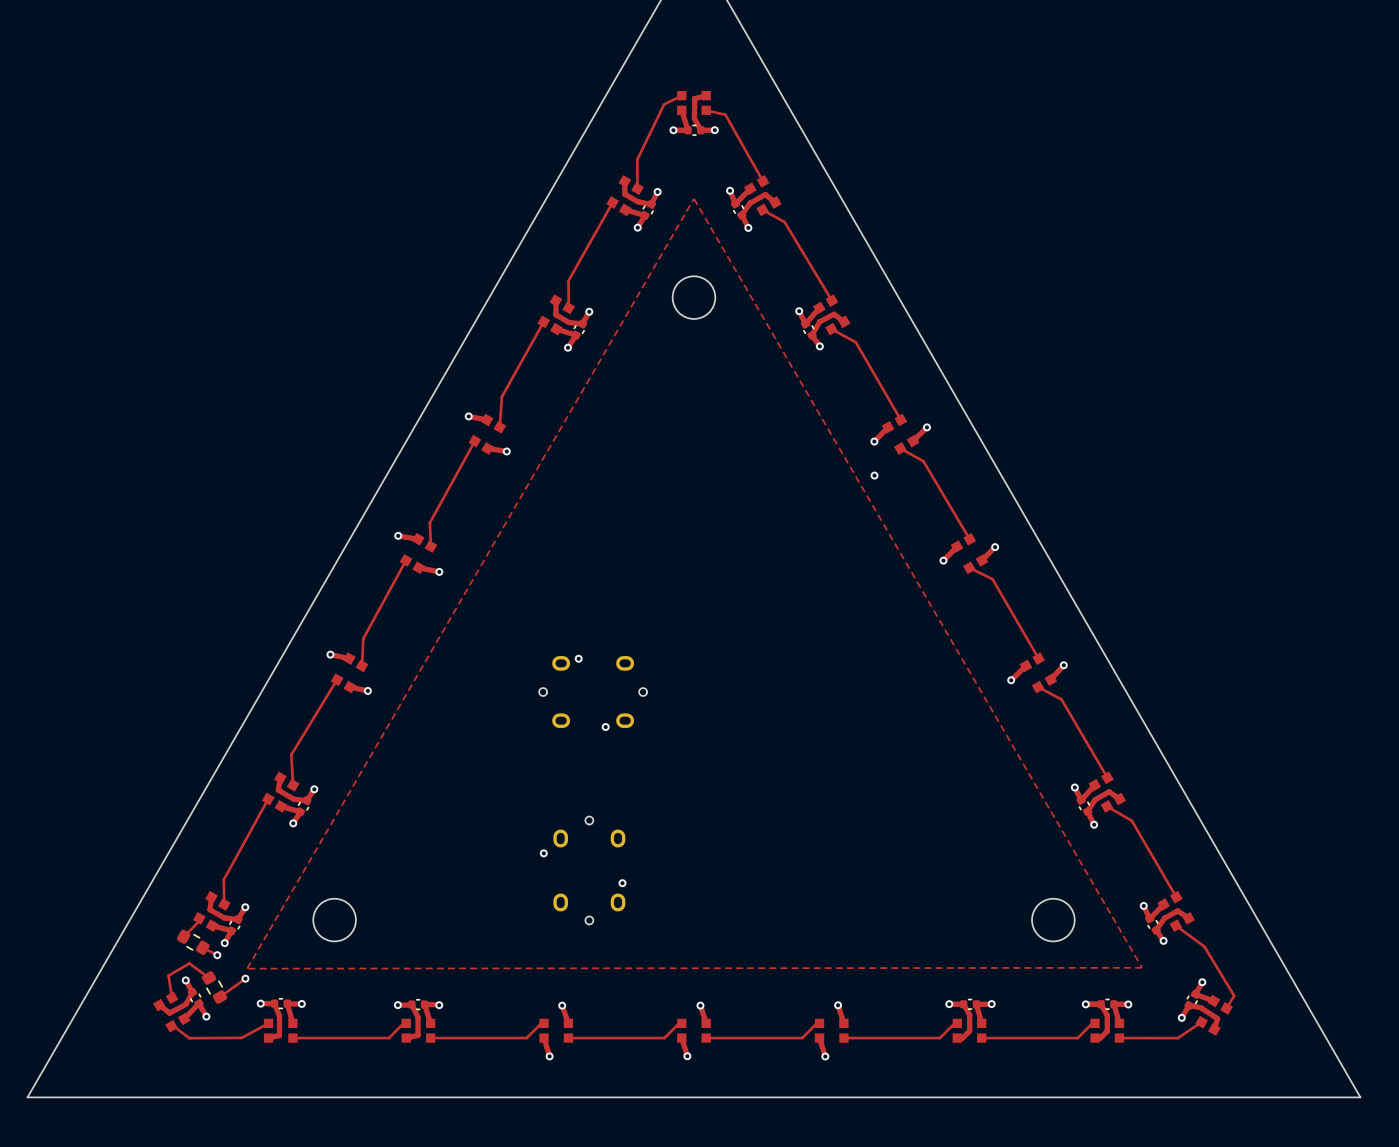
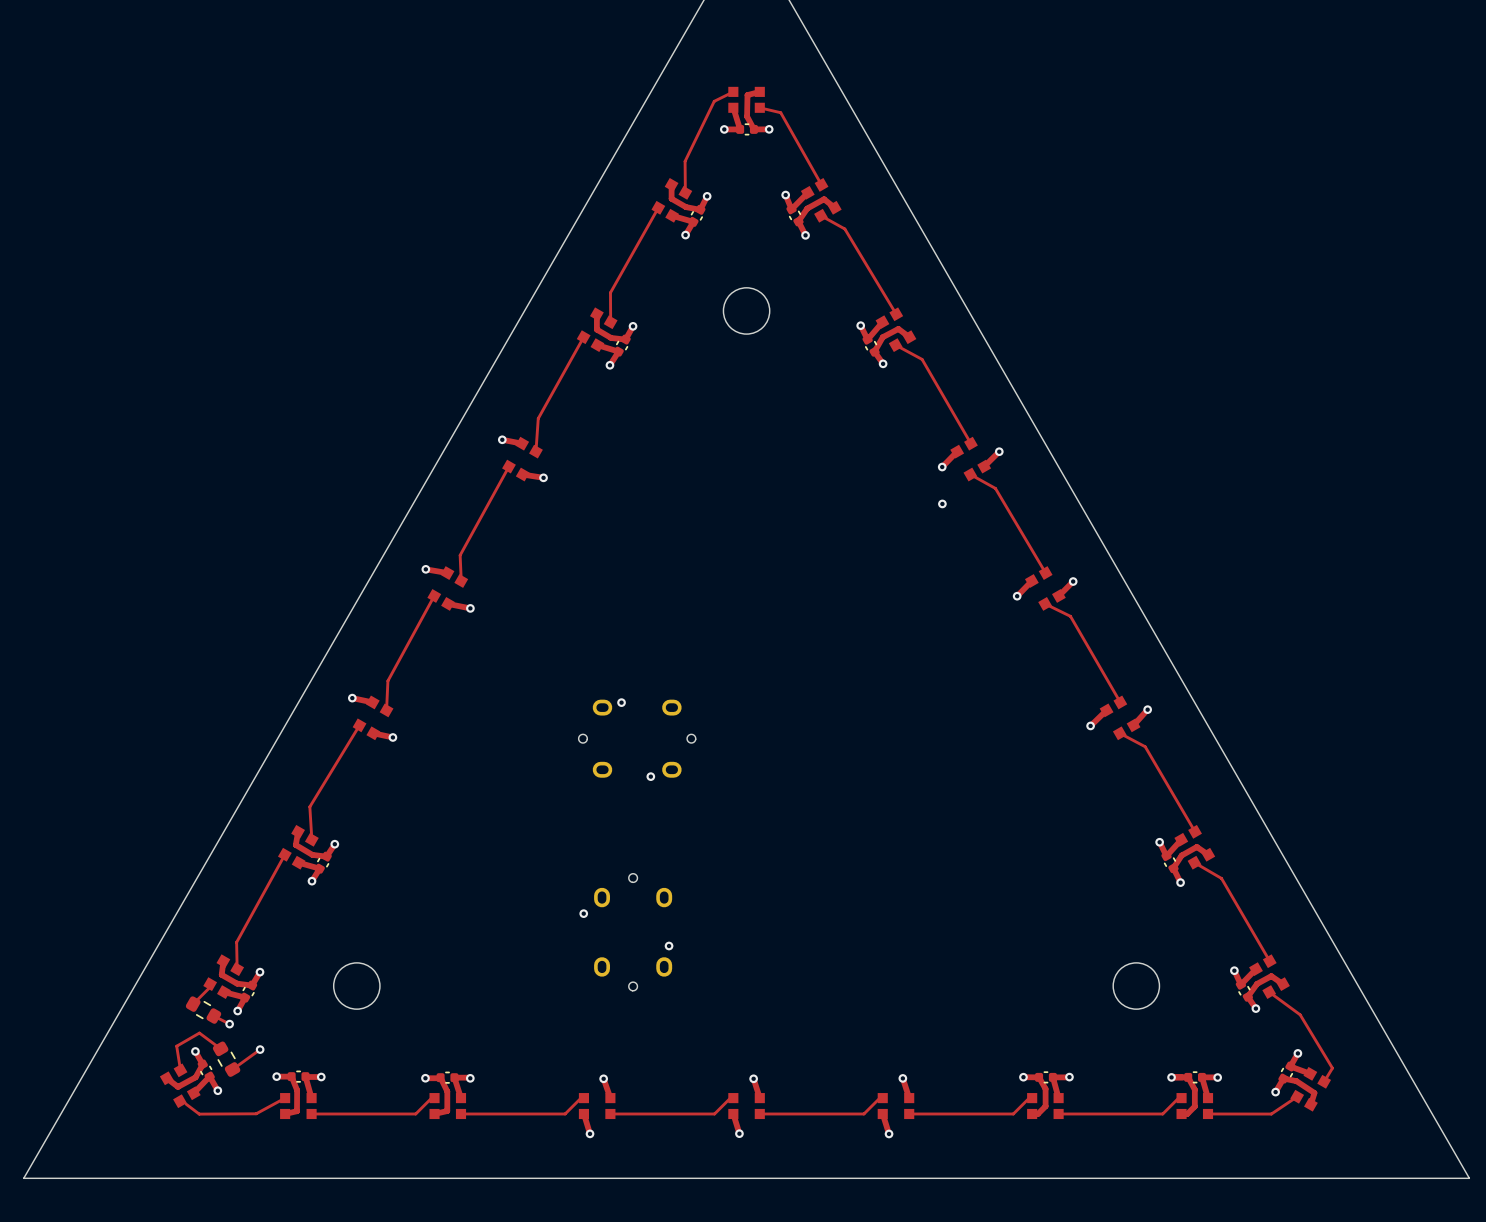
zone outline: (1142, 967) (247, 968) (693, 198) (1142, 967) -> none

